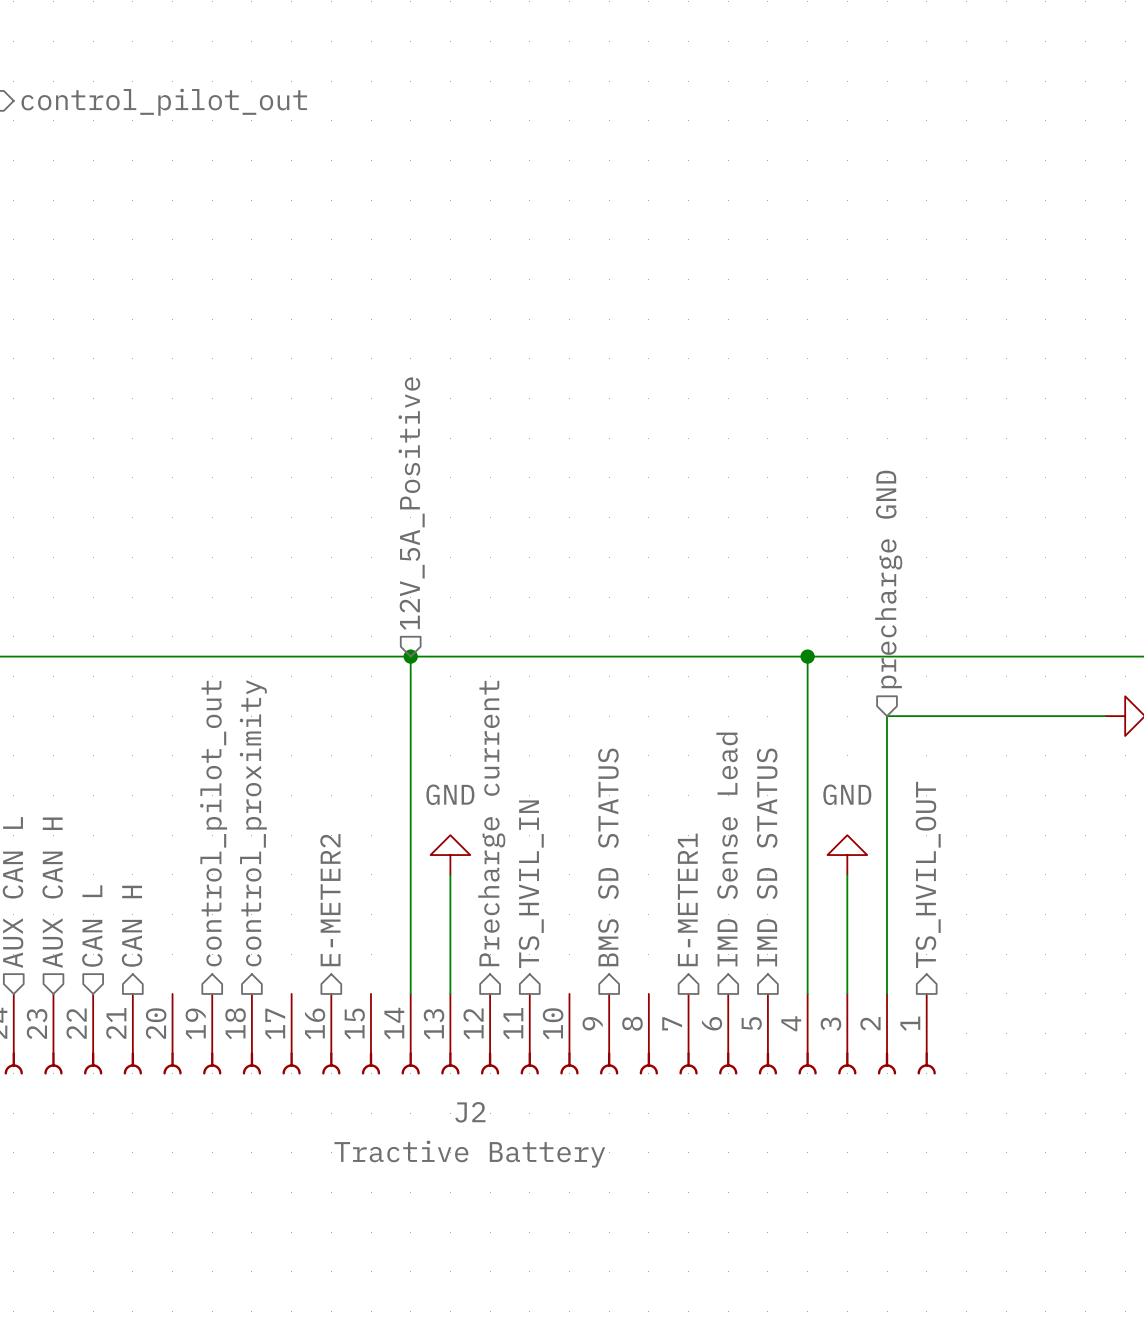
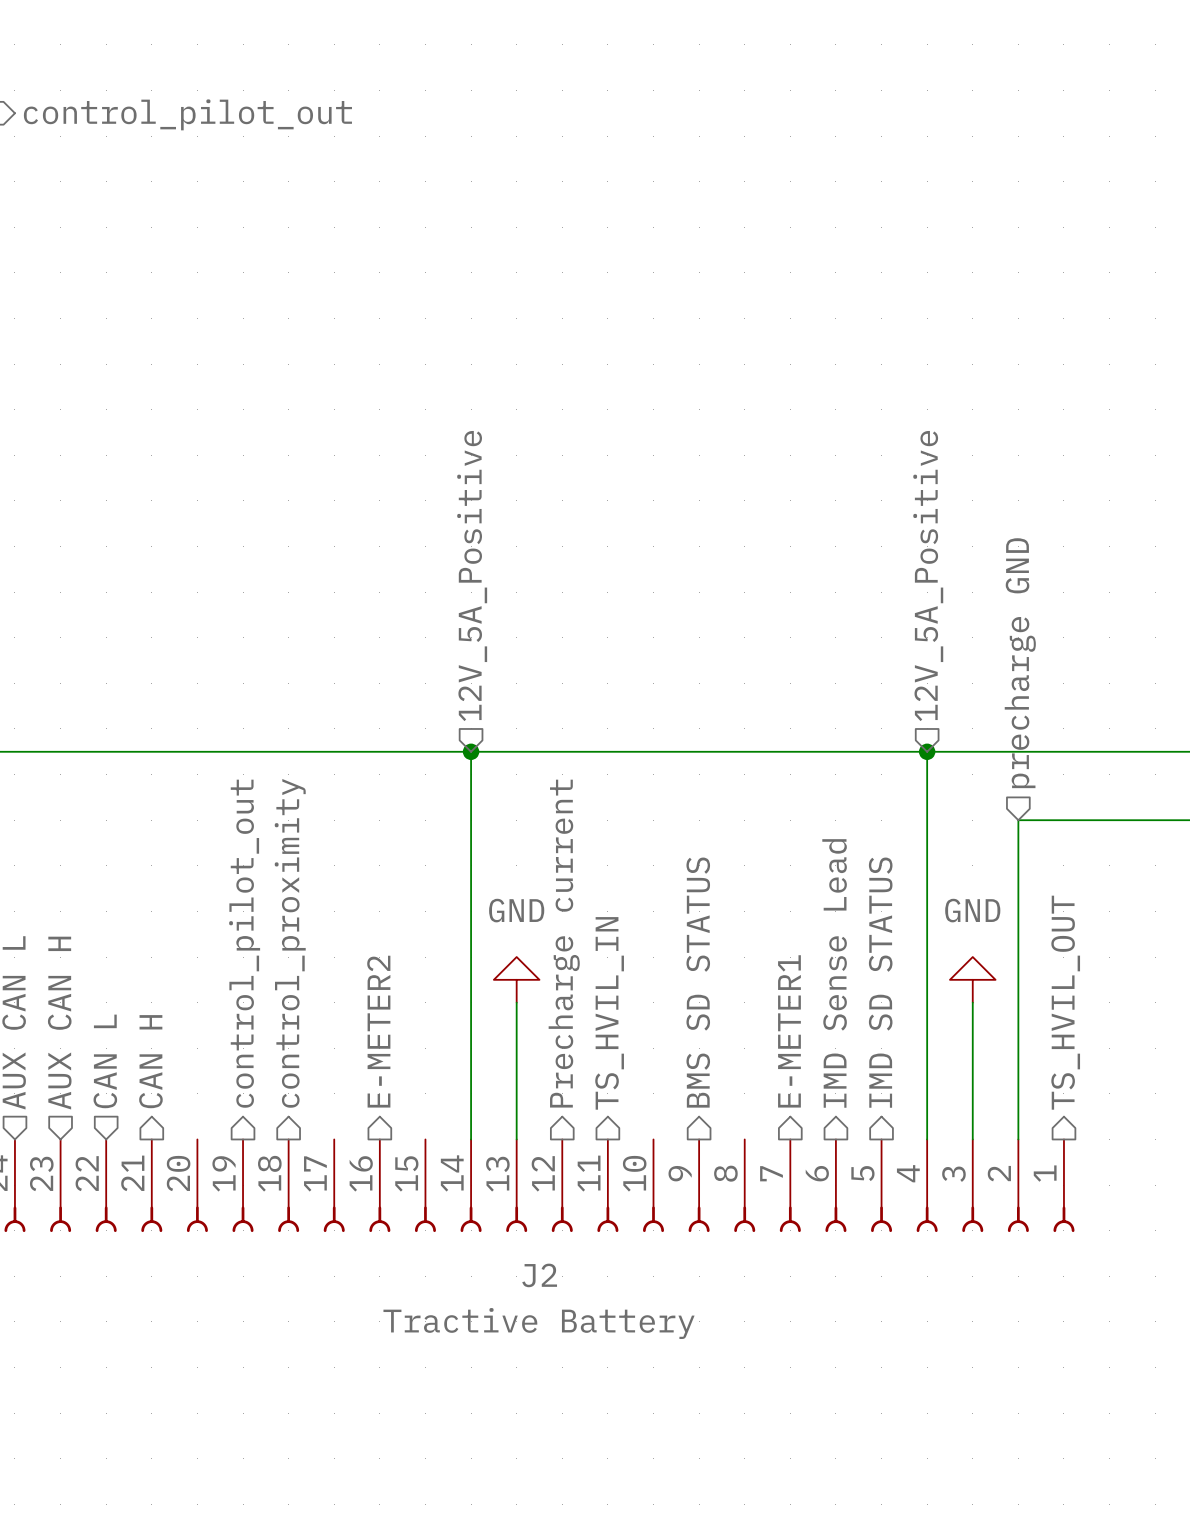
hierarchical label: none -> 12V_5A_Positive (928, 576)

